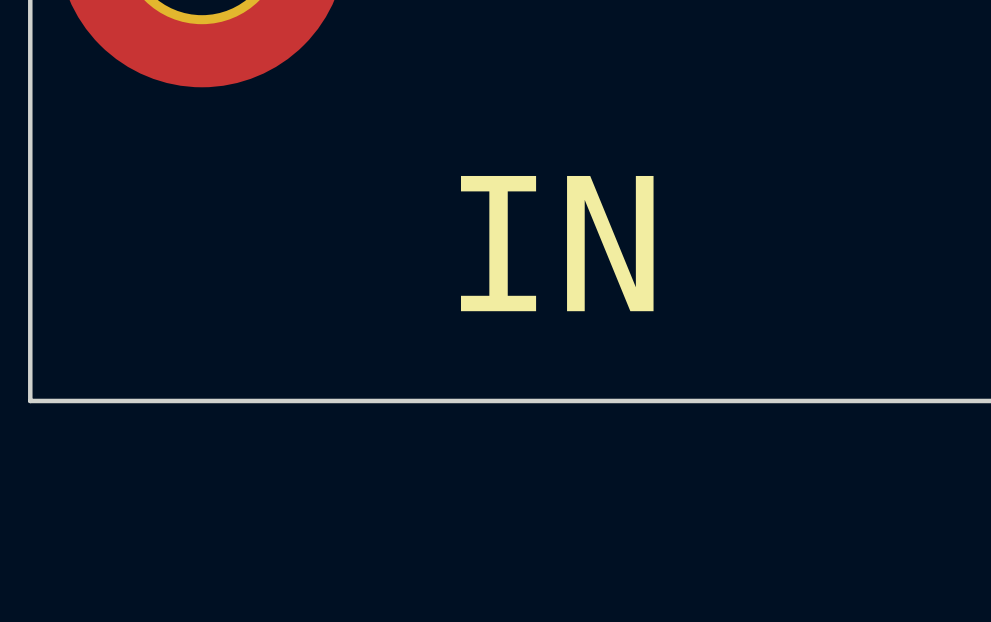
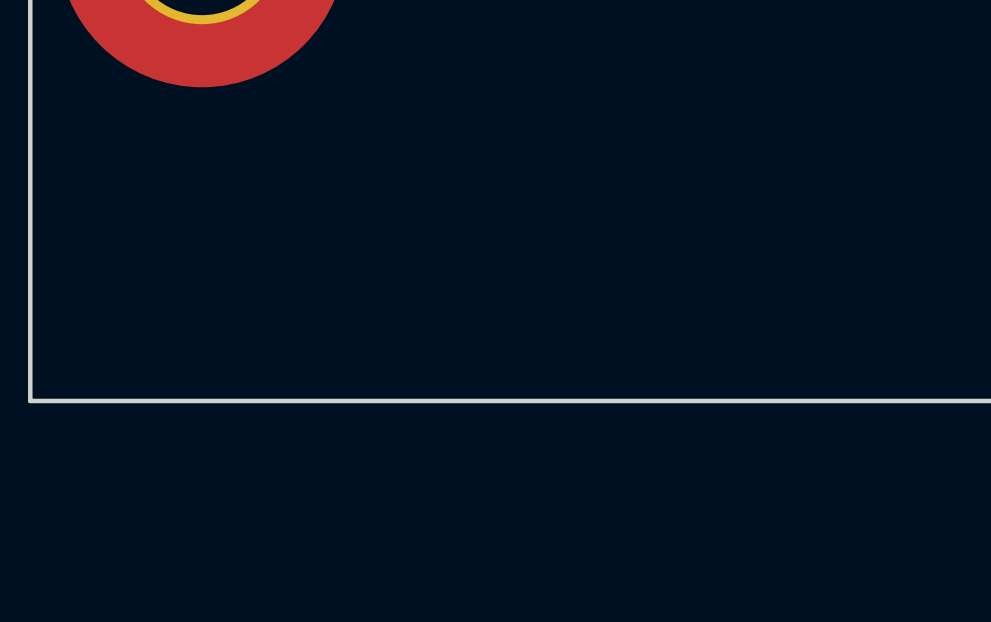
text: IN (557, 243) -> none

